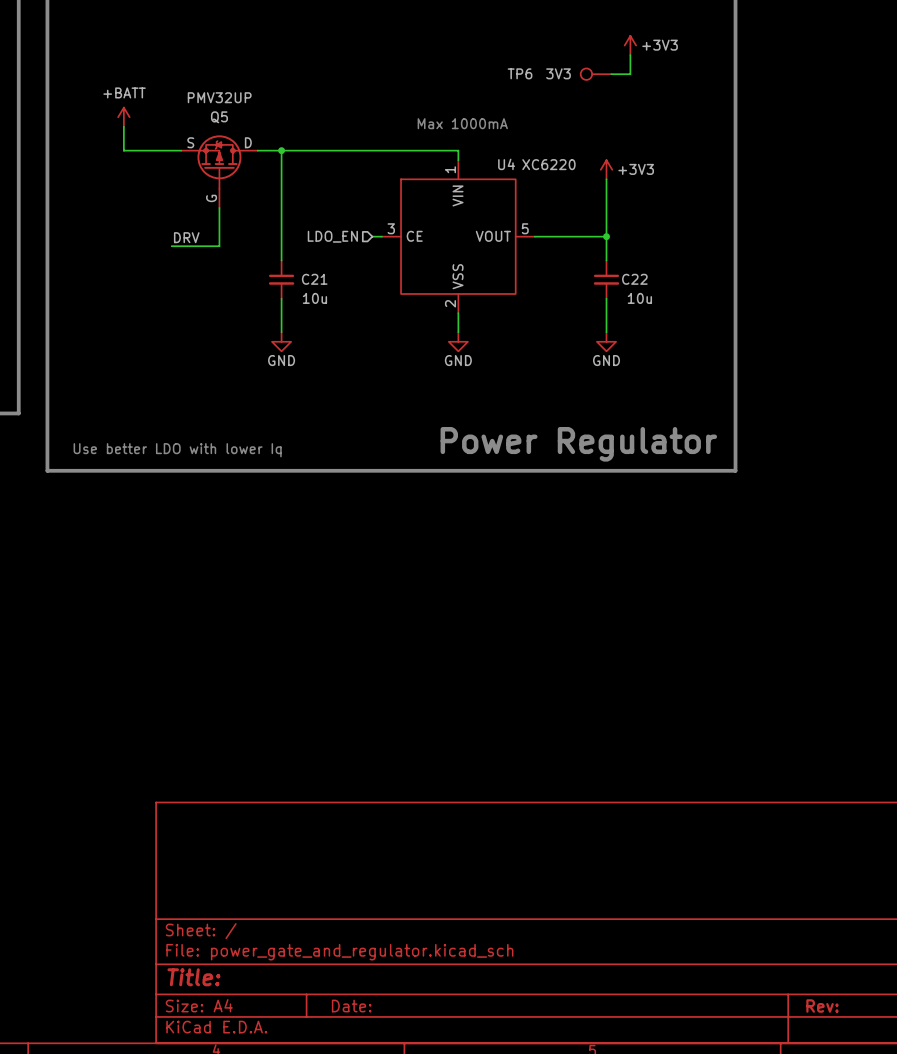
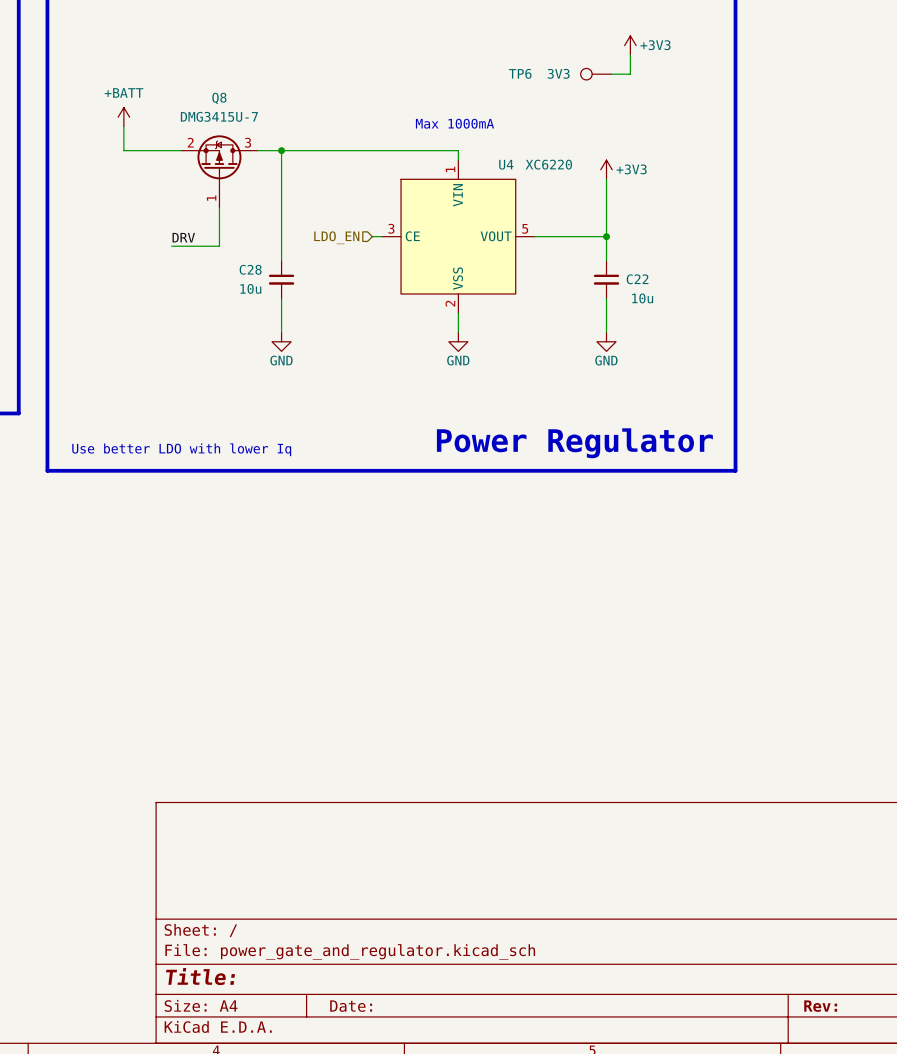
Q5 value: PMV32UP (219, 97) -> DMG3415U-7 (219, 116)
Q5 name: Q5 (219, 117) -> Q8 (219, 98)
Q5 pin name: S (190, 142) -> none
Q5 pin number: none -> 2 (190, 142)
Q5 pin number: none -> 3 (248, 142)
Q5 pin name: D (248, 142) -> none
Q5 pin name: G (211, 198) -> none
Q5 pin number: none -> 1 (211, 198)
C21 name: C21 (314, 279) -> C28 (250, 269)
C21 value position: 10u (314, 298) -> 10u (250, 288)

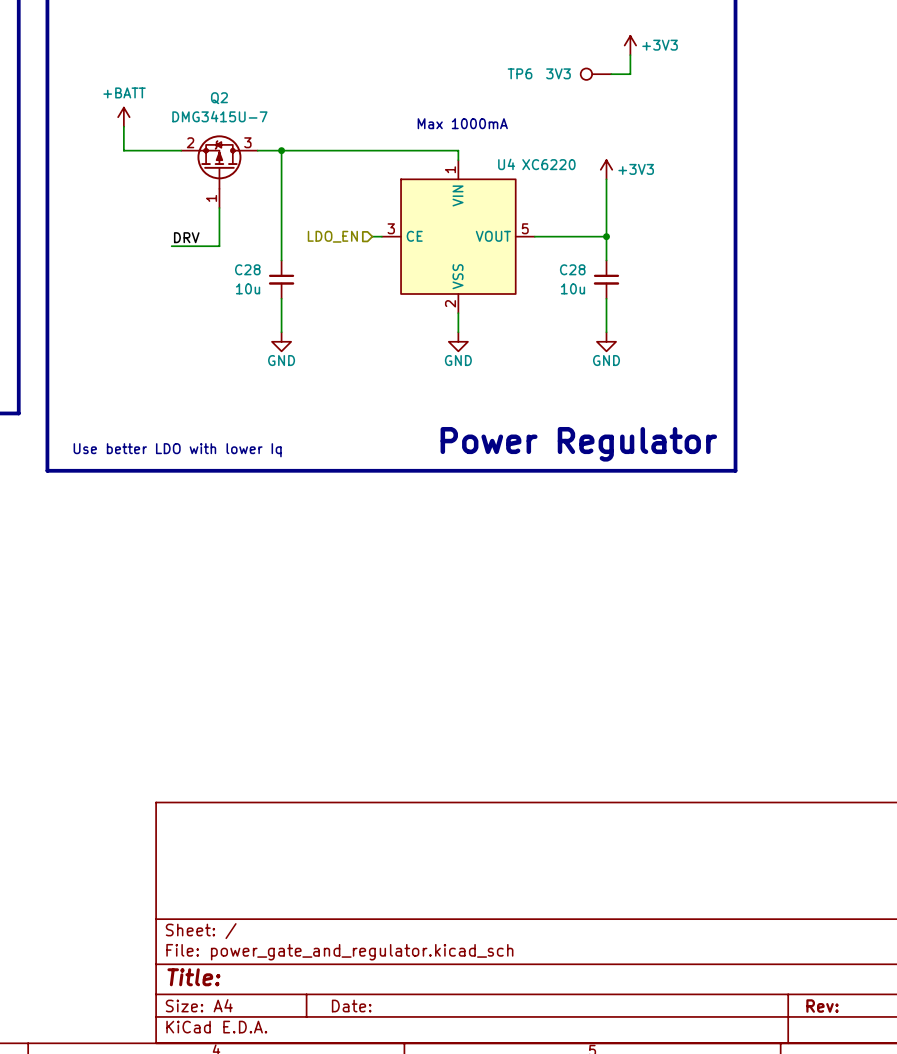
Q8 name: Q8 (219, 98) -> Q2 (219, 98)
C22 name: C22 (637, 279) -> C28 (572, 269)
C22 value position: 10u (642, 298) -> 10u (572, 288)

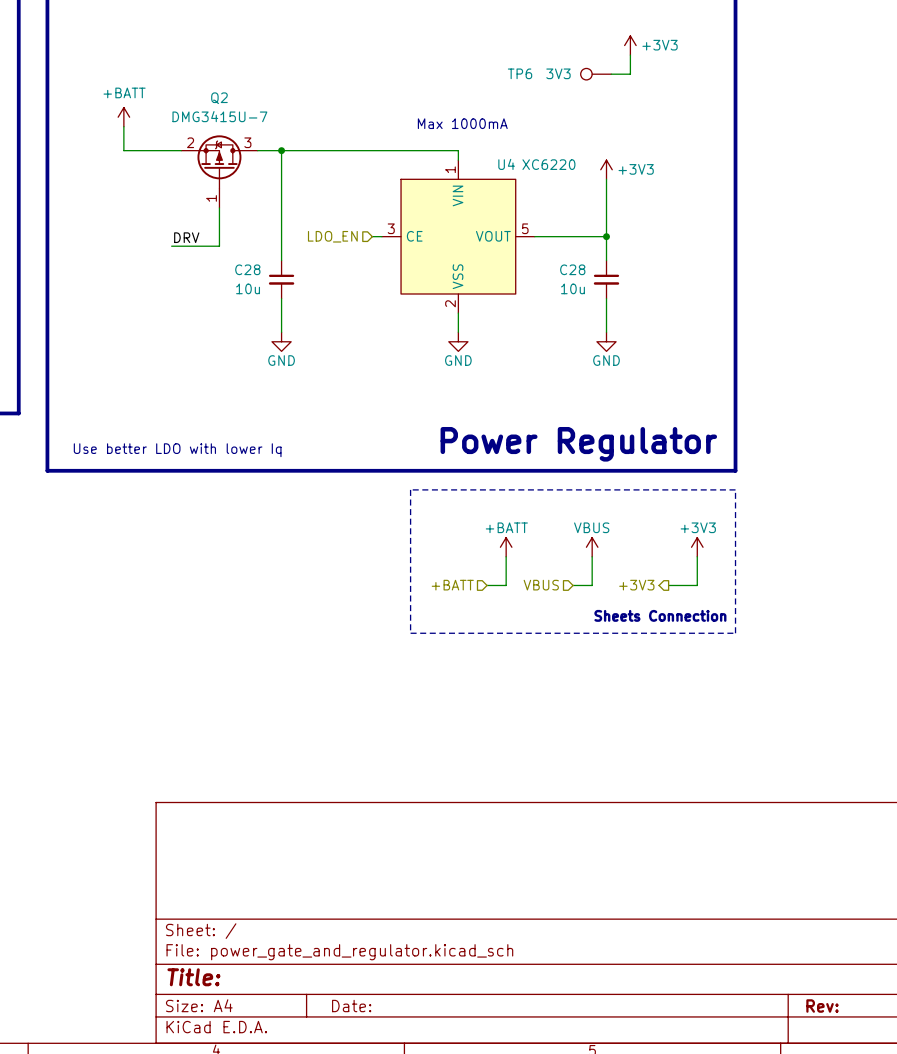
line: none -> (410, 489) (735, 489) (735, 633) (410, 633) (410, 489)
power symbol: none -> +BATT (506, 547)
power symbol: none -> VBUS (592, 547)
power symbol: none -> +3V3 (697, 547)
wire: none -> (506, 556) (506, 585) (487, 585)
wire: none -> (592, 556) (592, 585) (573, 585)
wire: none -> (697, 556) (697, 585) (668, 585)
hierarchical label: none -> +BATT (452, 585)
hierarchical label: none -> VBUS (541, 585)
hierarchical label: none -> +3V3 (636, 585)
text: none -> Sheets Connection (660, 615)

